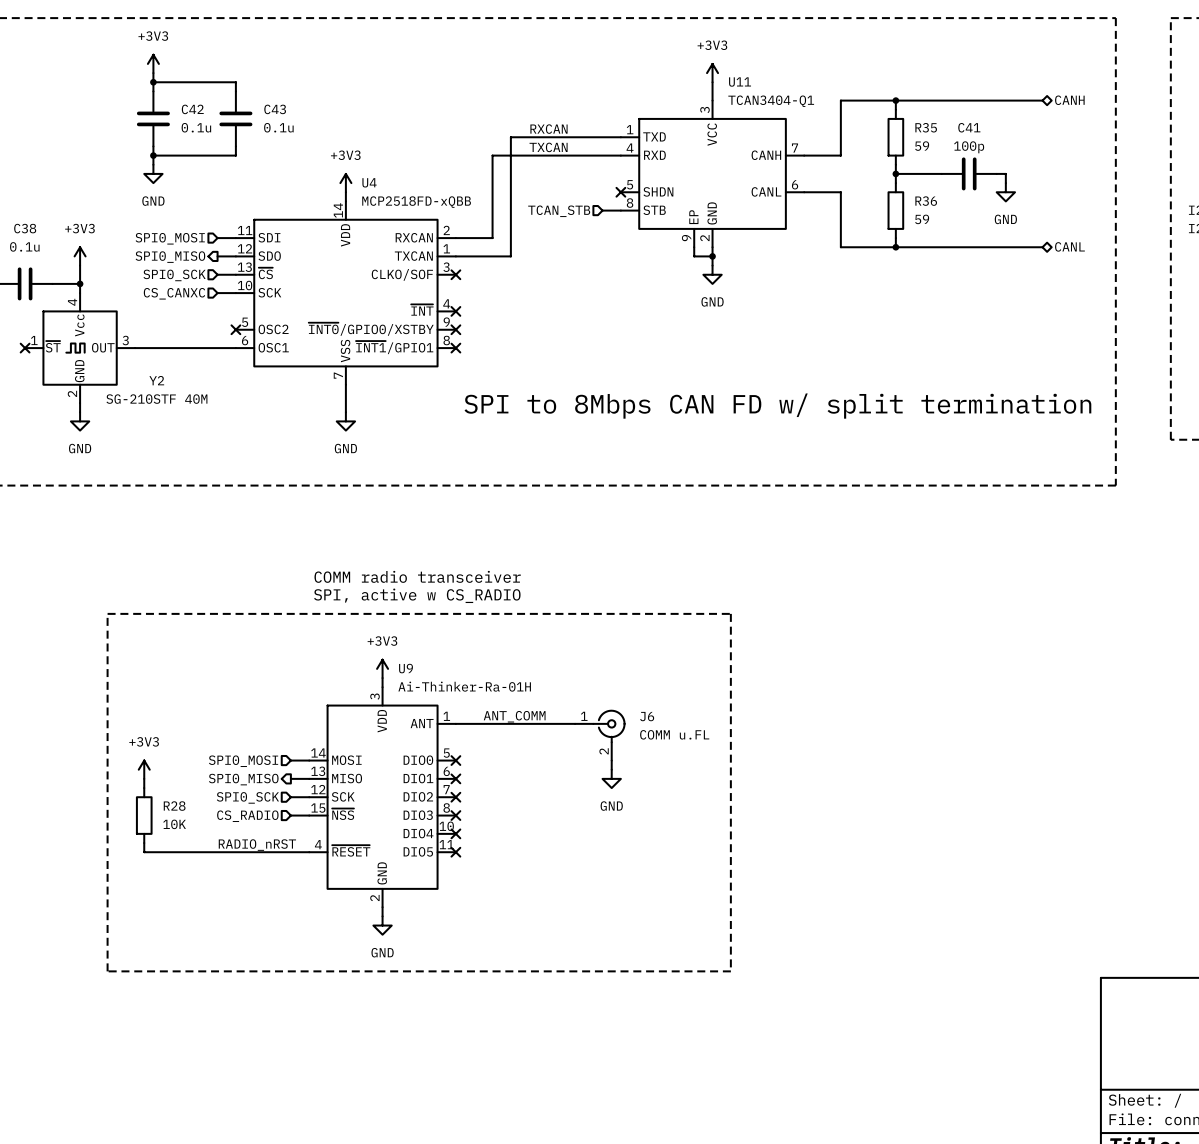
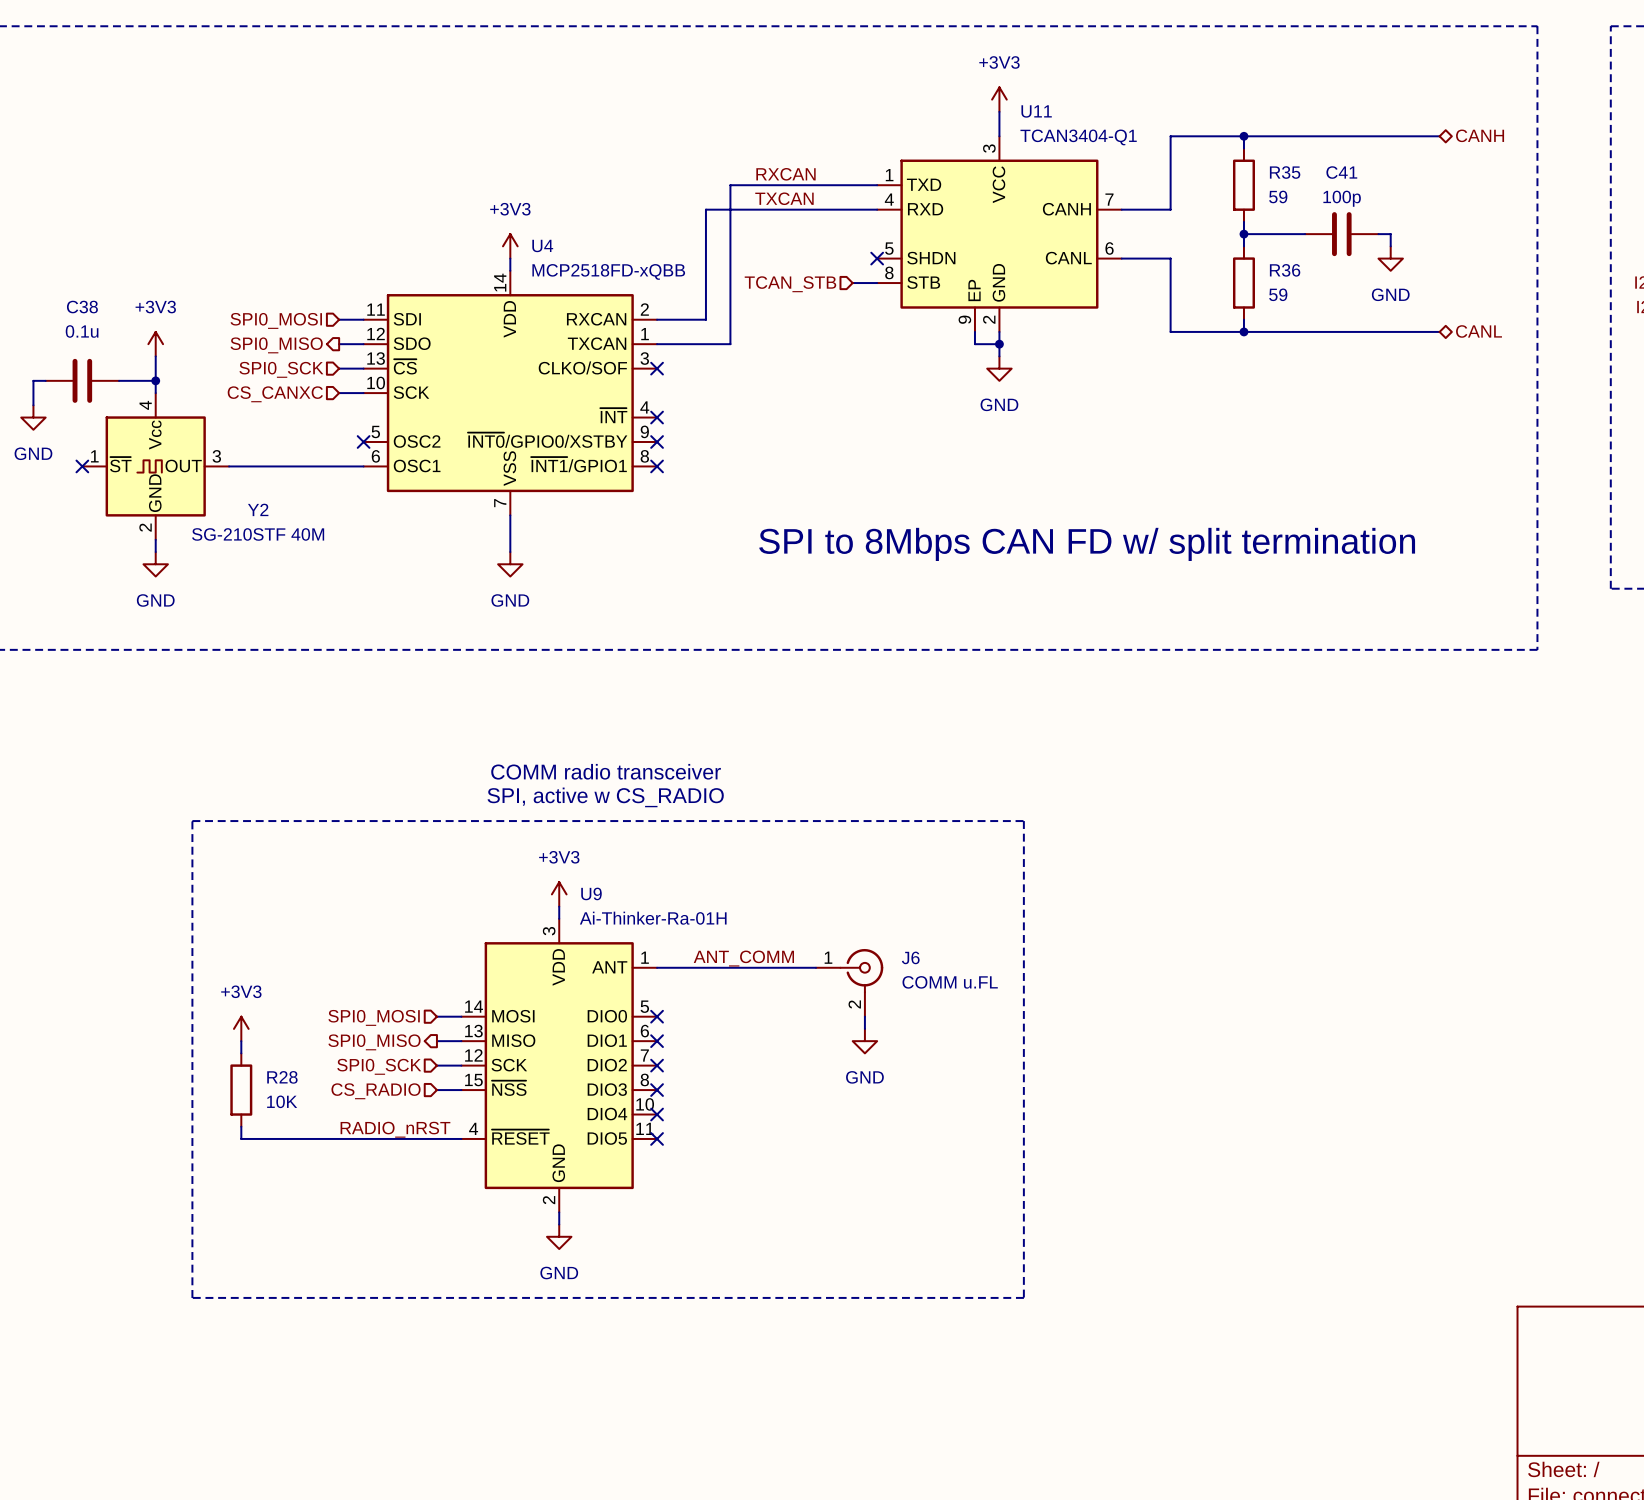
power symbol: +3V3 (153, 63) -> none
wire: (153, 73) (153, 91) -> none
wire: (153, 82) (235, 82) (235, 91) -> none
junction: (153, 82) -> none
C42: 0.1u (153, 118) -> none
C43: 0.1u (235, 118) -> none
wire: (153, 146) (153, 164) -> none
wire: (235, 146) (235, 155) (153, 155) -> none
junction: (153, 155) -> none
power symbol: GND (153, 173) -> none

